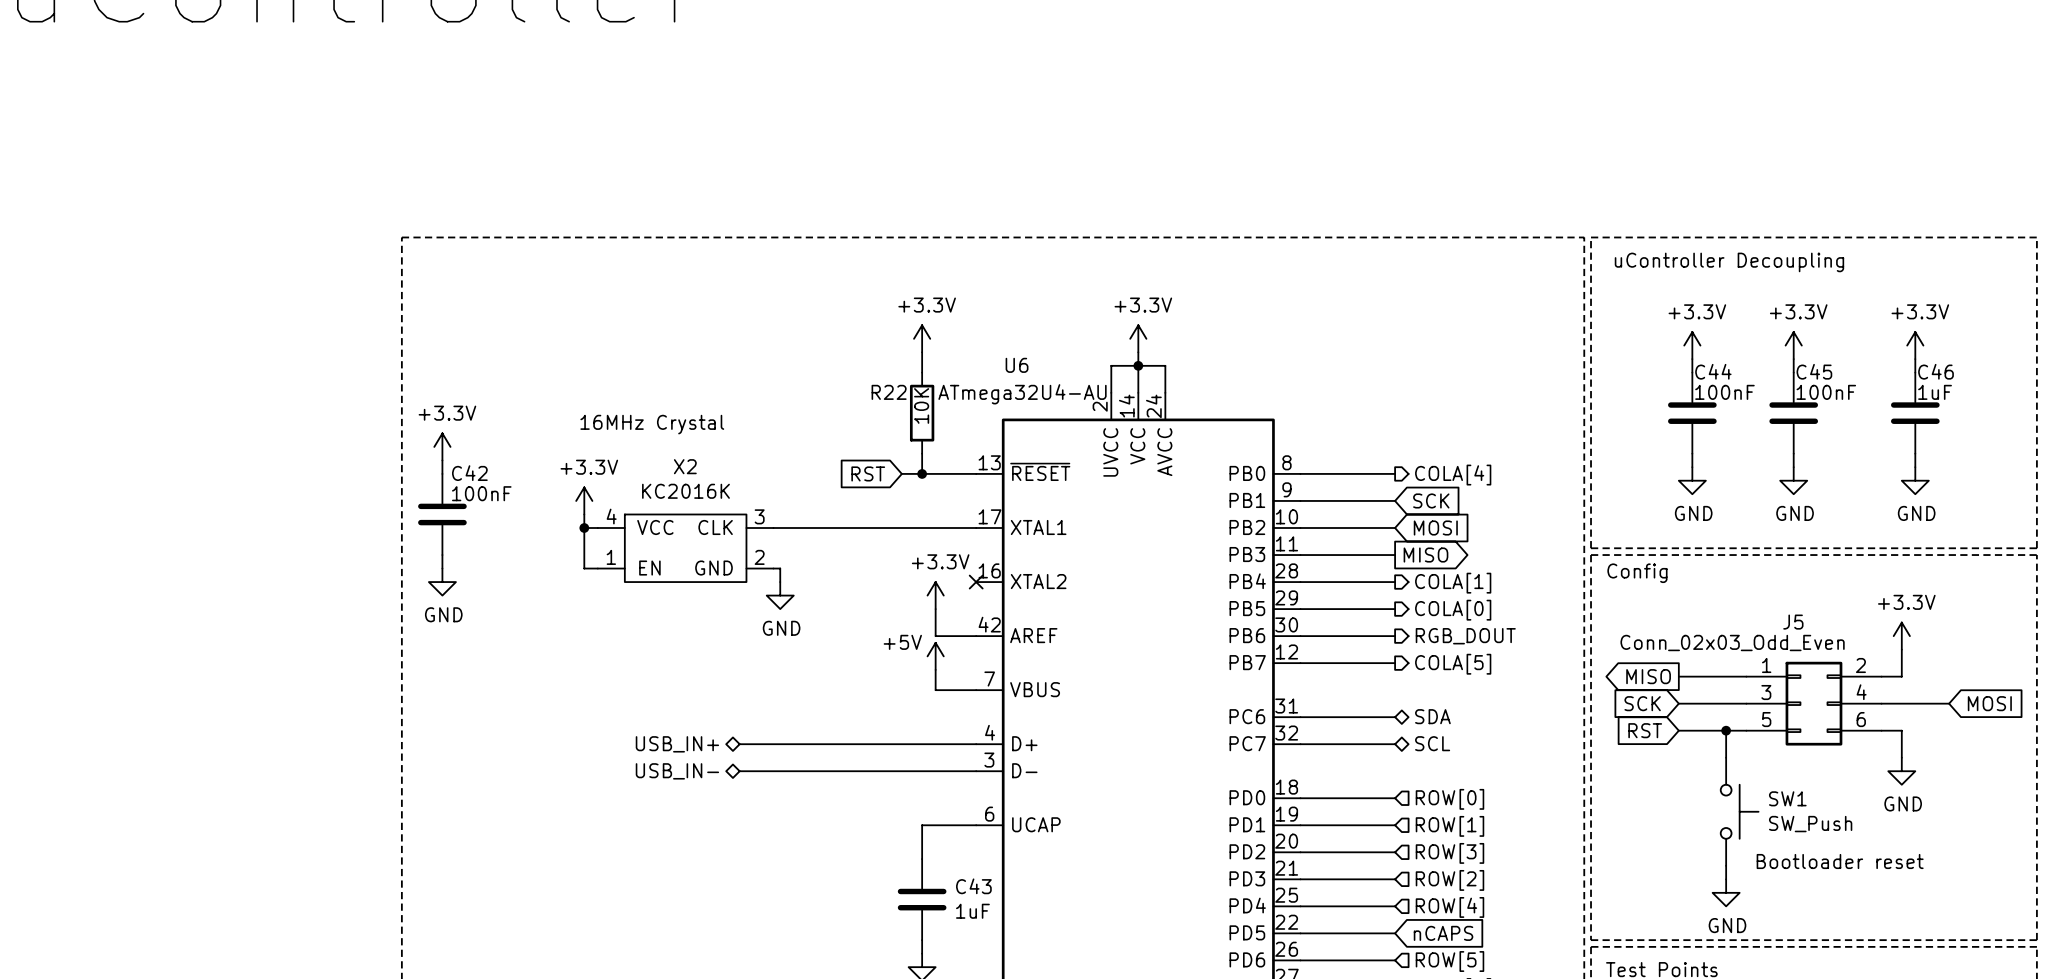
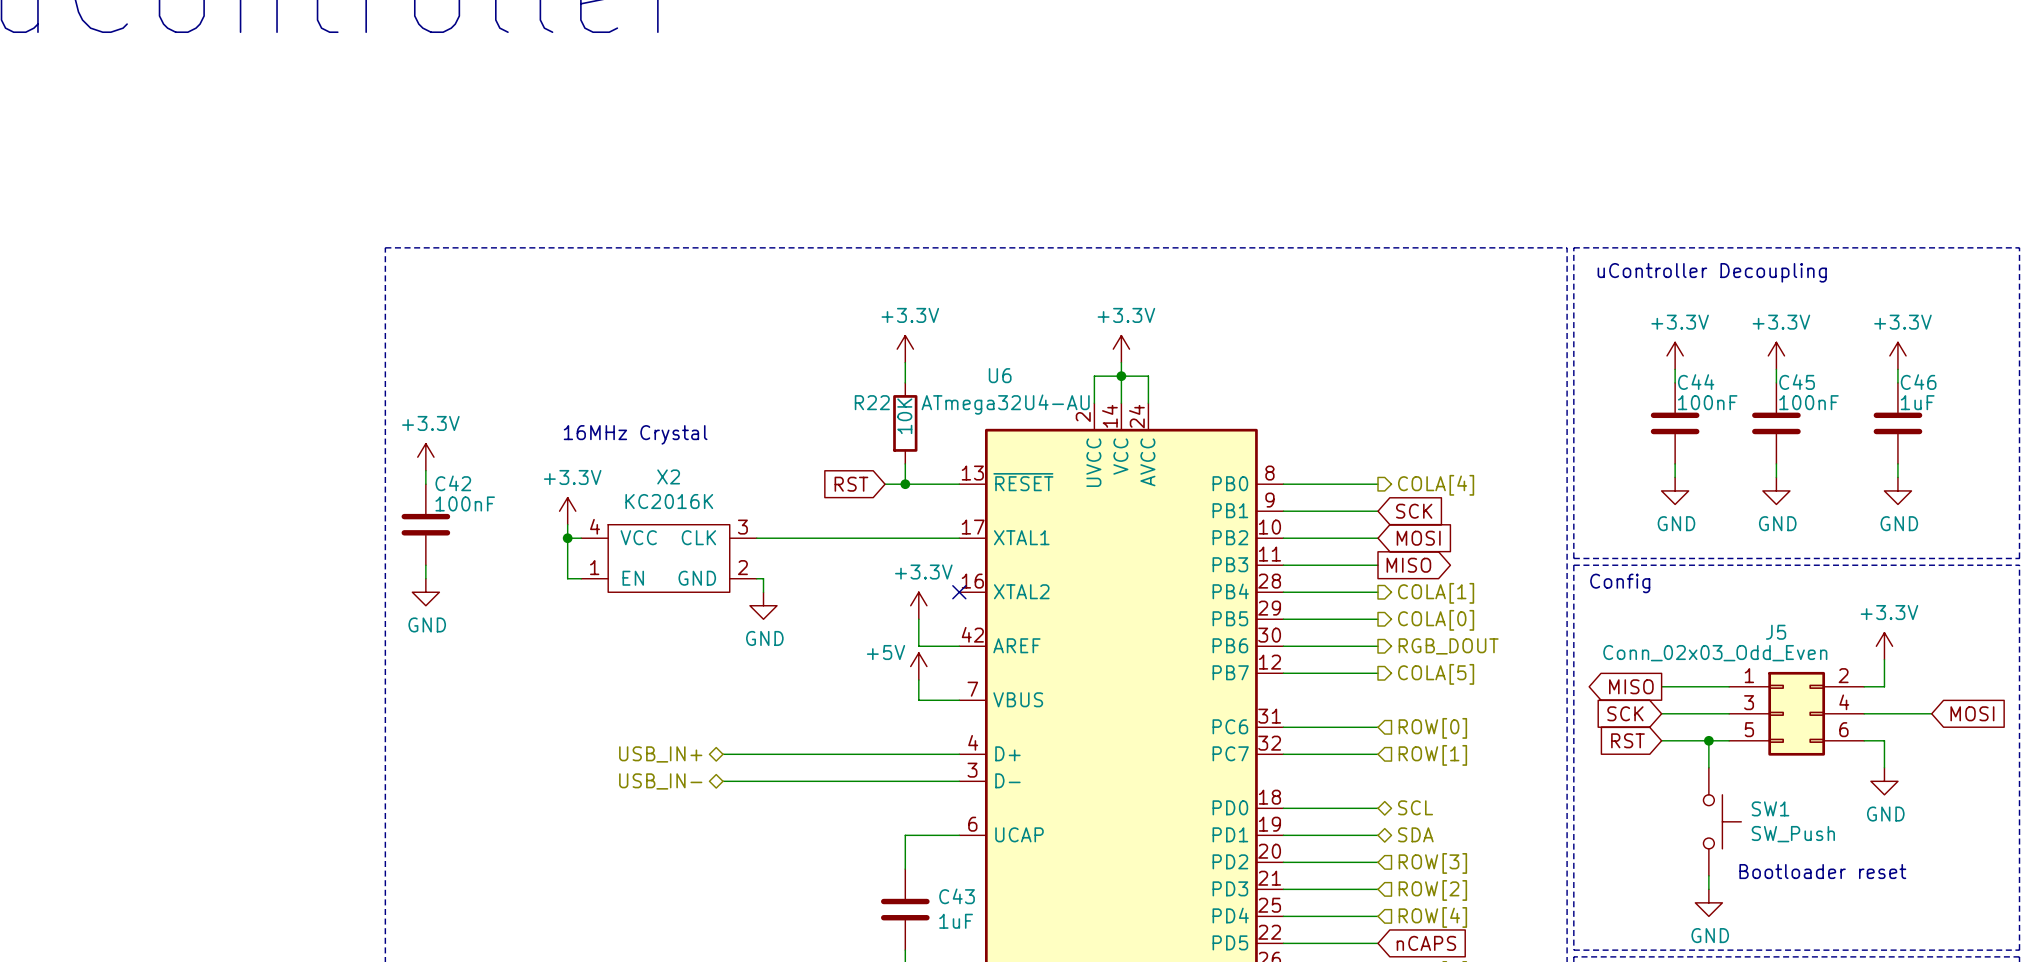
hierarchical label shape: bidirectional (1432, 716) -> input (1432, 728)
hierarchical label: SDA (1432, 716) -> ROW[0] (1432, 728)
hierarchical label shape: bidirectional (1432, 743) -> input (1432, 755)
hierarchical label: SCL (1432, 743) -> ROW[1] (1432, 755)
hierarchical label shape: input (1449, 799) -> bidirectional (1415, 807)
hierarchical label: ROW[0] (1449, 799) -> SCL (1415, 807)
hierarchical label shape: input (1449, 826) -> bidirectional (1415, 834)
hierarchical label: ROW[1] (1449, 826) -> SDA (1415, 834)

